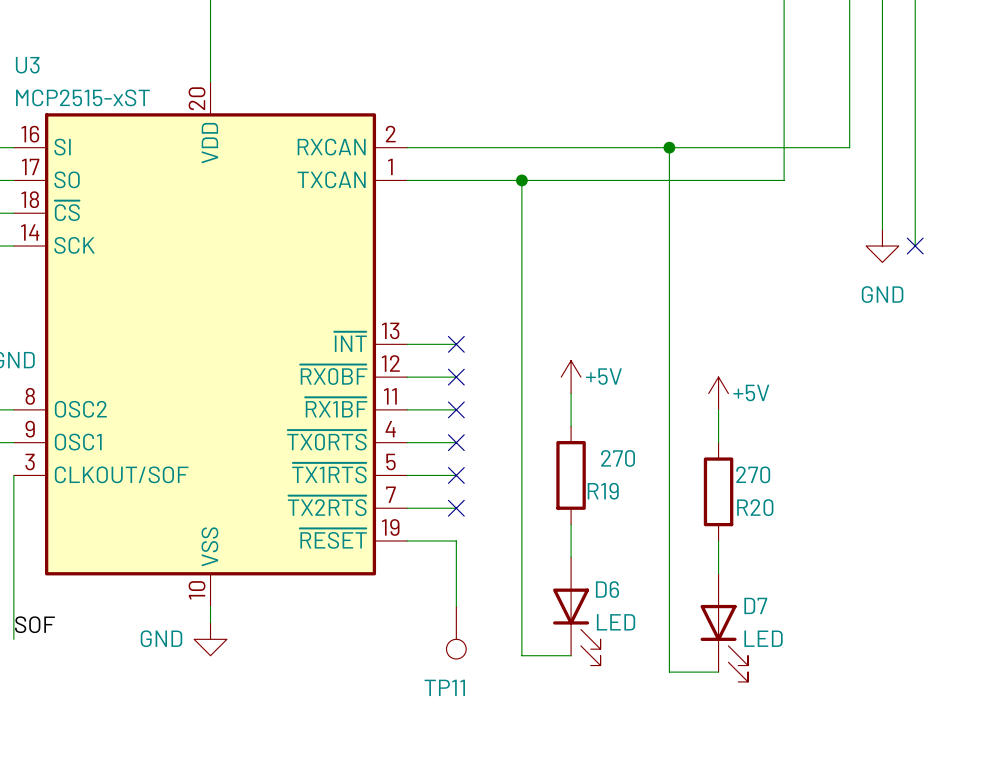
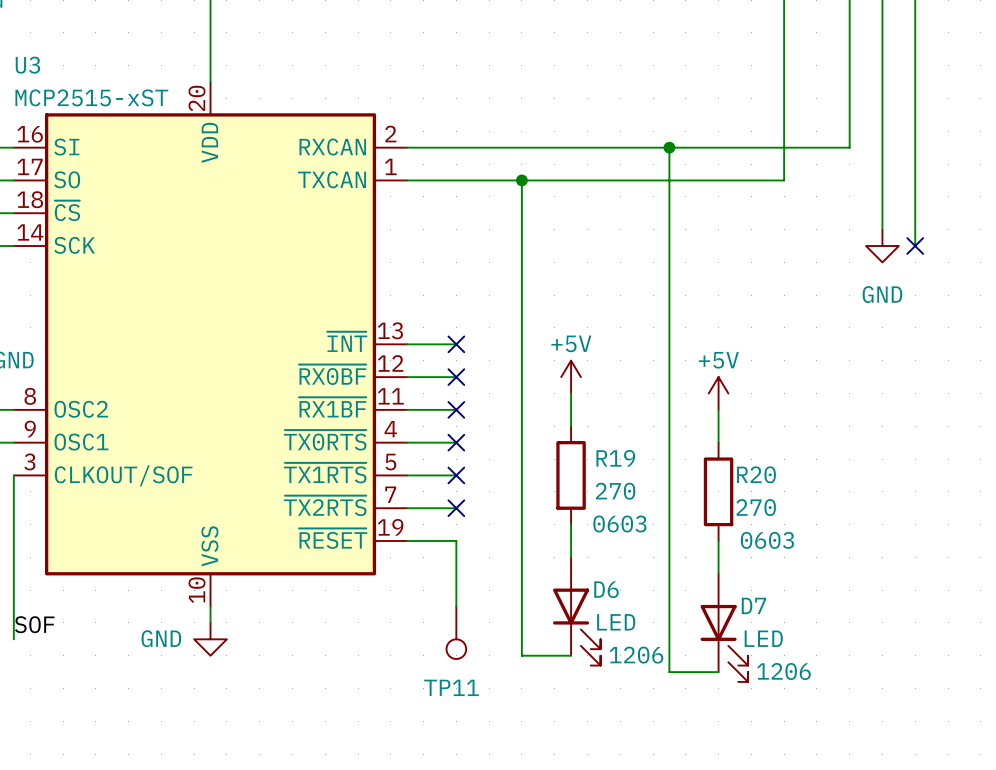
power symbol text position: +5V (603, 376) -> +5V (571, 343)
power symbol text position: +5V (751, 392) -> +5V (718, 360)
R19 value position: 270 (618, 458) -> 270 (615, 491)
R20 value position: 270 (753, 474) -> 270 (756, 507)
R19 name position: R19 (603, 491) -> R19 (615, 458)
R20 name position: R20 (755, 507) -> R20 (756, 474)
R19 text: none -> 0603 (619, 524)
R20 text: none -> 0603 (767, 540)
D6 text: none -> 1206 (636, 655)
D7 text: none -> 1206 (783, 671)

